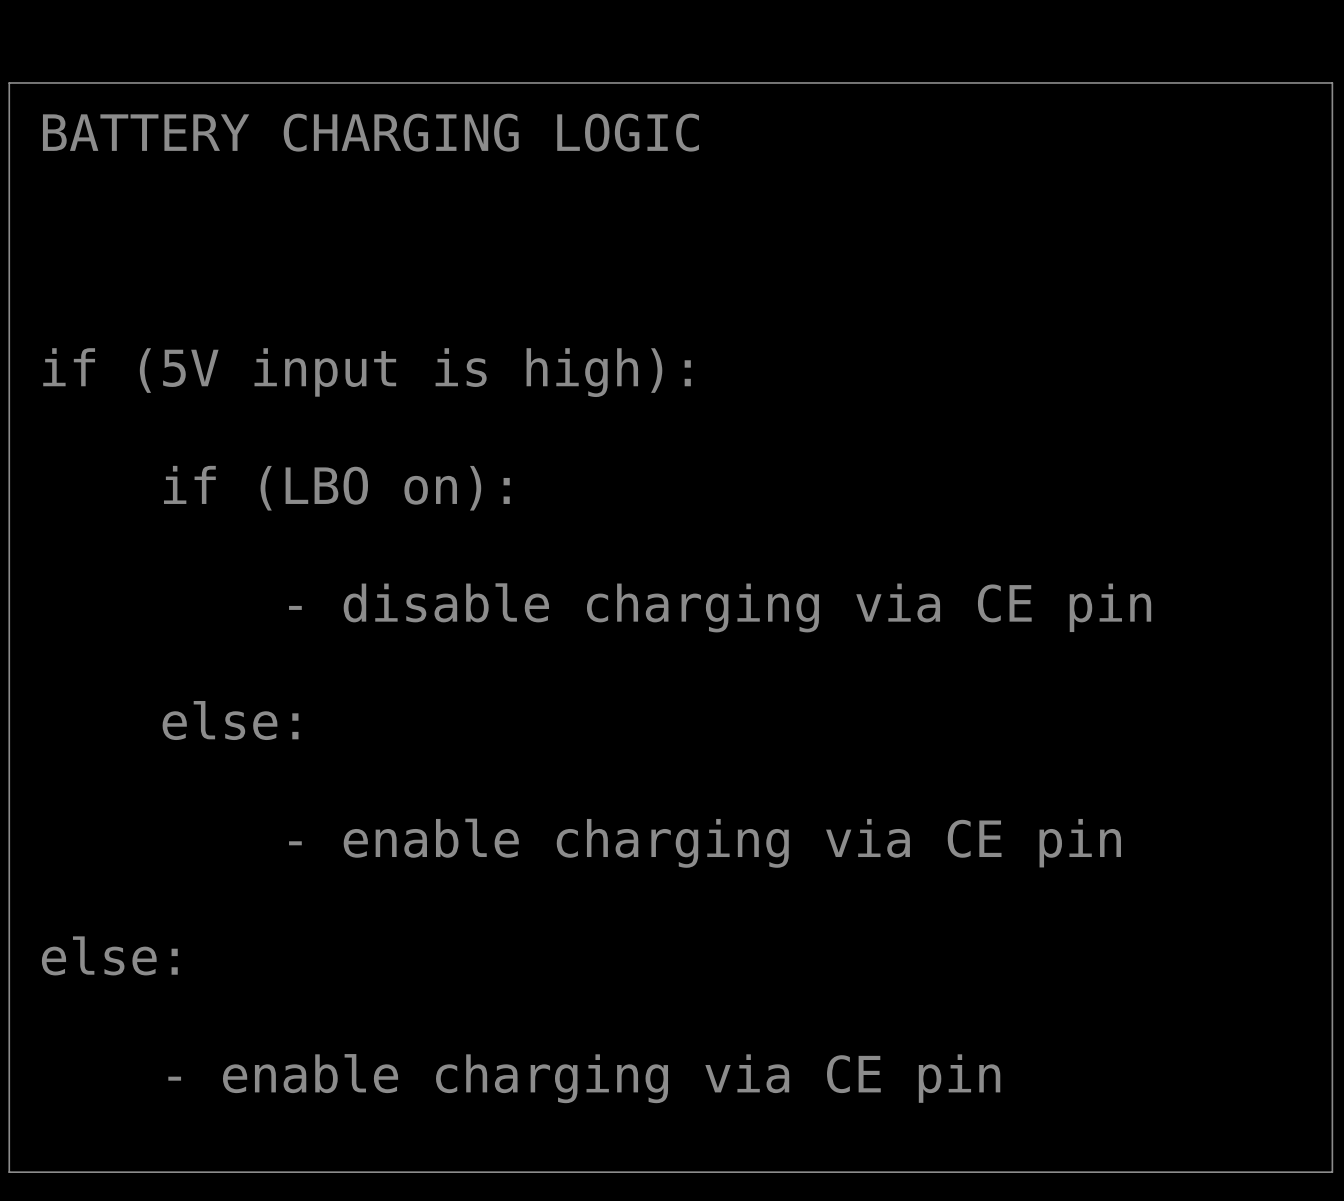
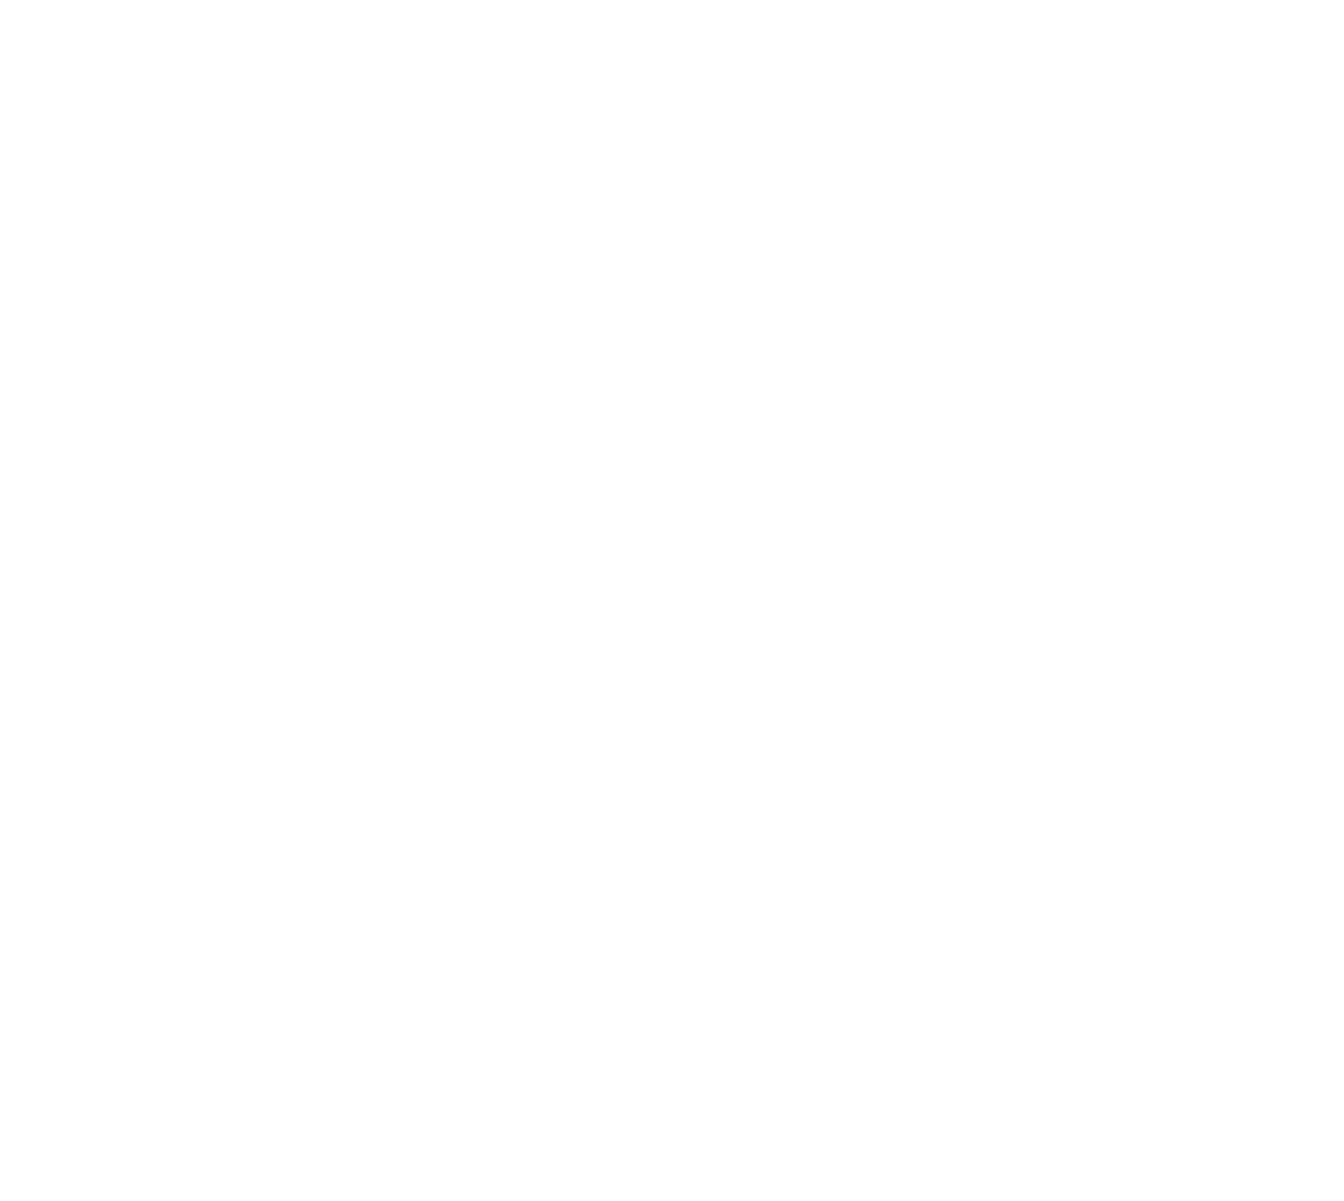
line: (9, 82) (1332, 82) (1332, 1172) (9, 1172) (9, 82) -> none
text: BATTERY CHARGING LOGIC (370, 132) -> none
text: if (5V input is high): (367, 372) -> none
text: if (LBO on): (336, 488) -> none
text: - disable charging via CE pin (720, 607) -> none
text: else: (230, 720) -> none
text: - enable charging via CE pin (705, 843) -> none
text: else: (109, 955) -> none
text: - enable charging via CE pin (584, 1078) -> none

